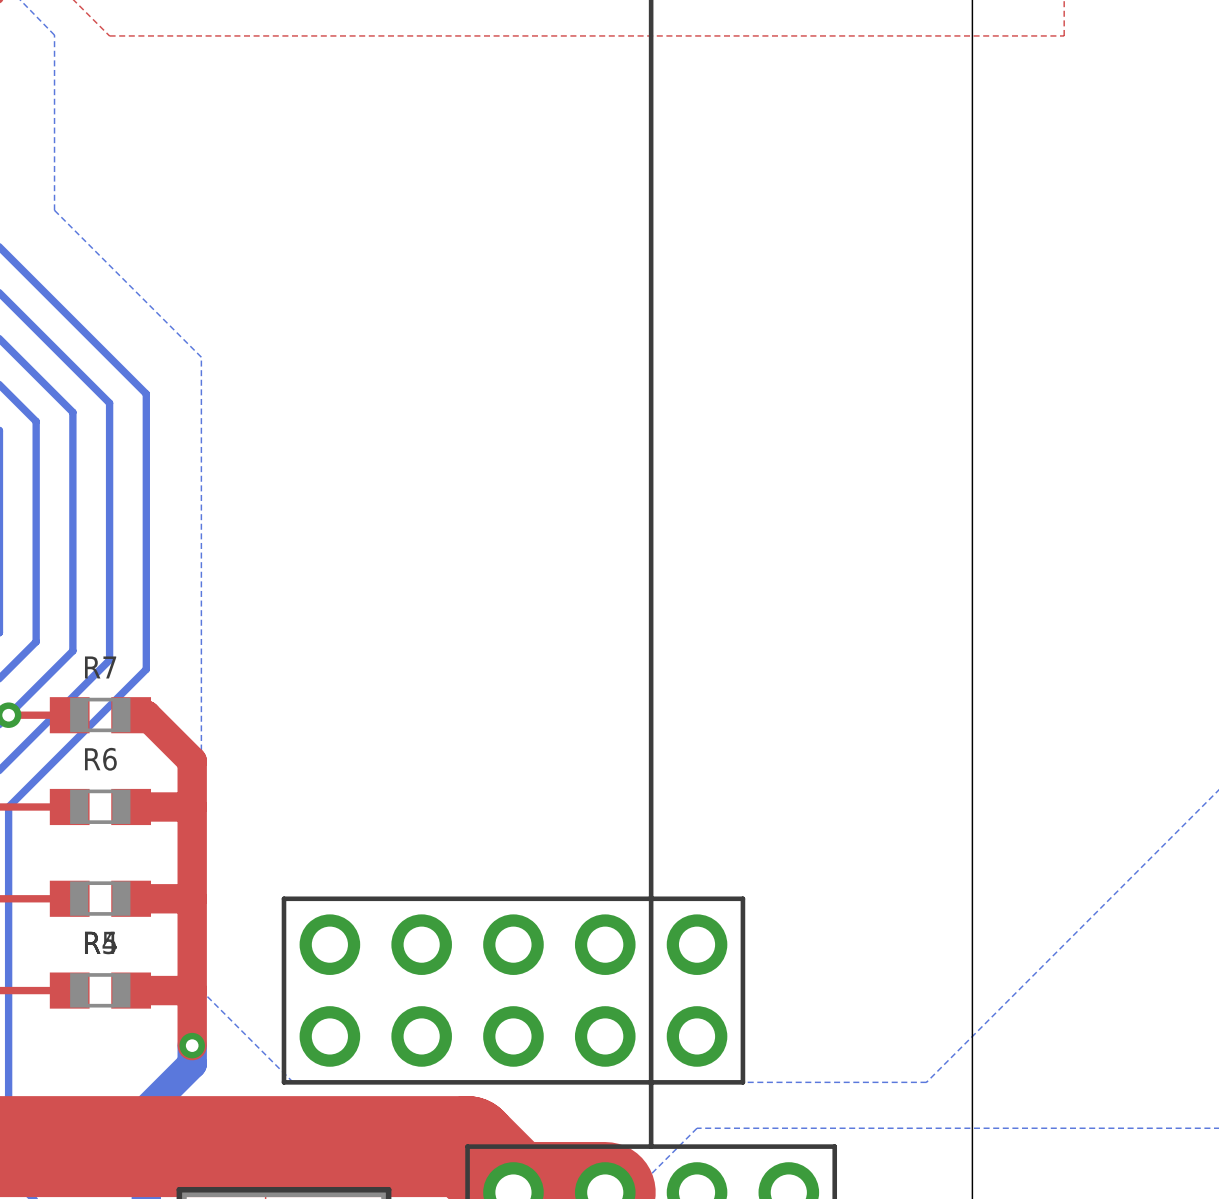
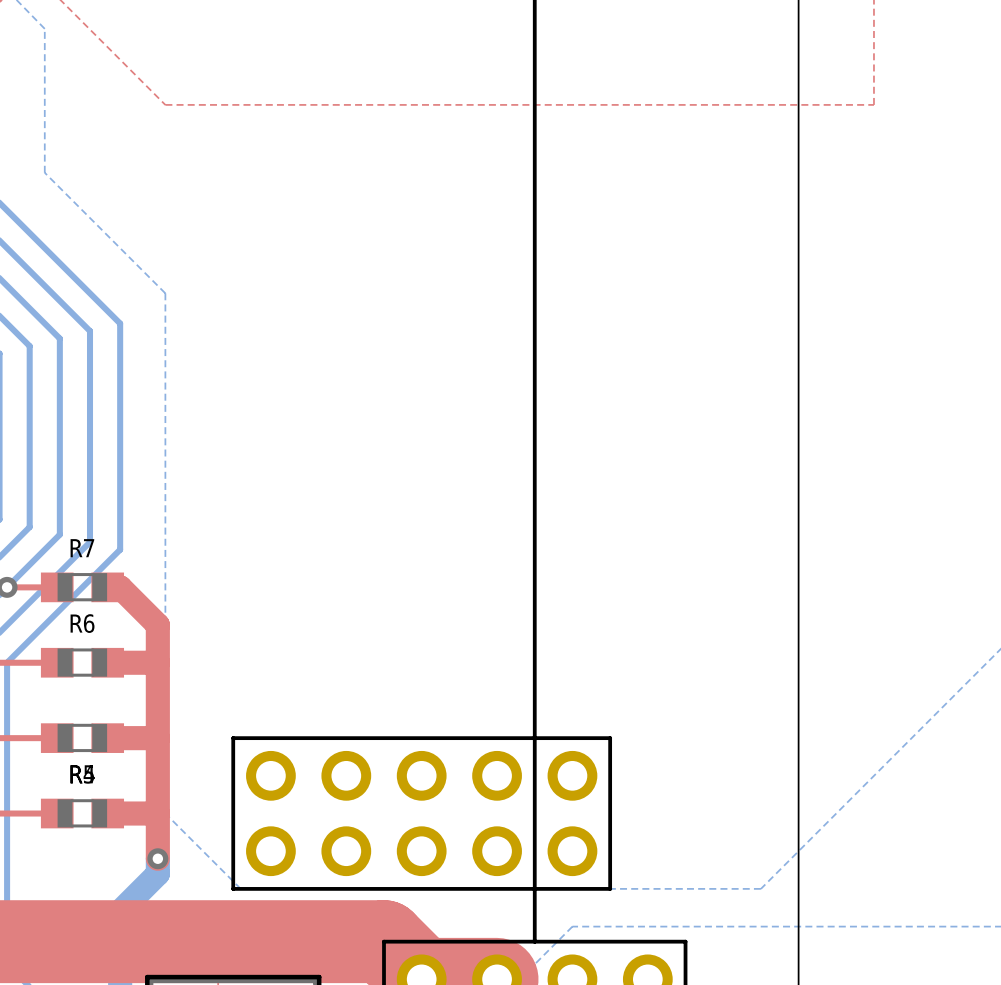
top zone outline: (109, 35) (1064, 35) -> (90, 29) (165, 104) (873, 104) (873, 29)

